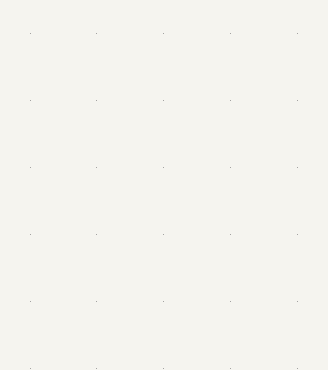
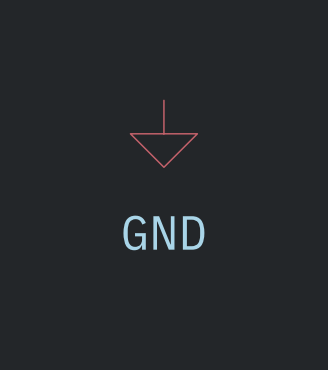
power symbol: none -> GND (163, 133)

